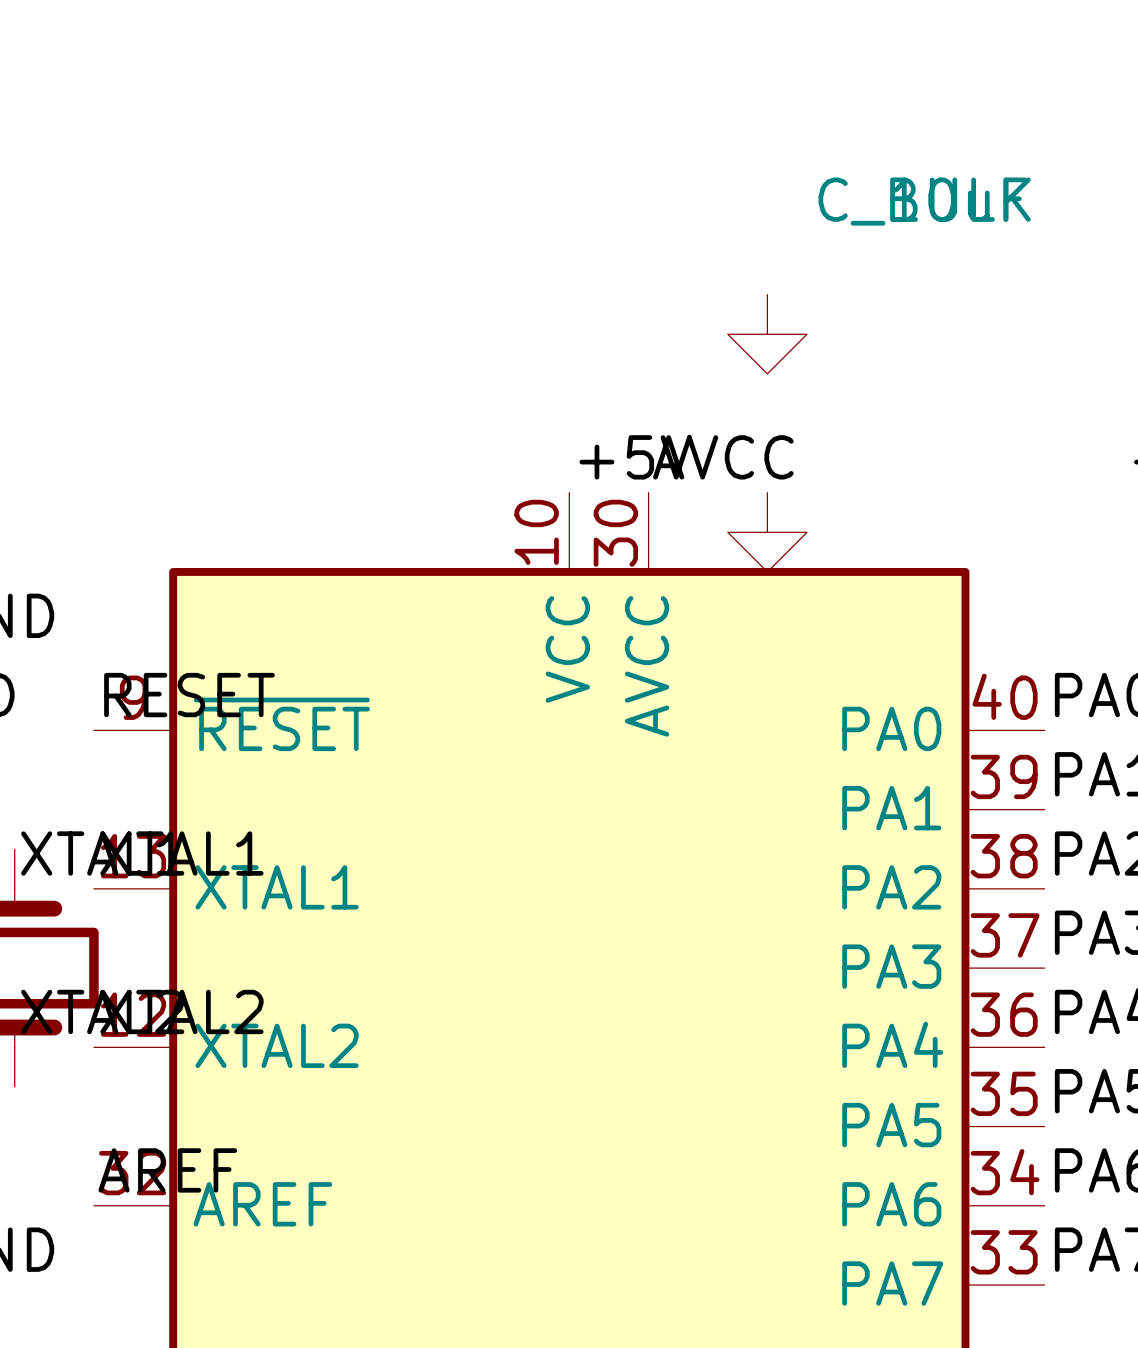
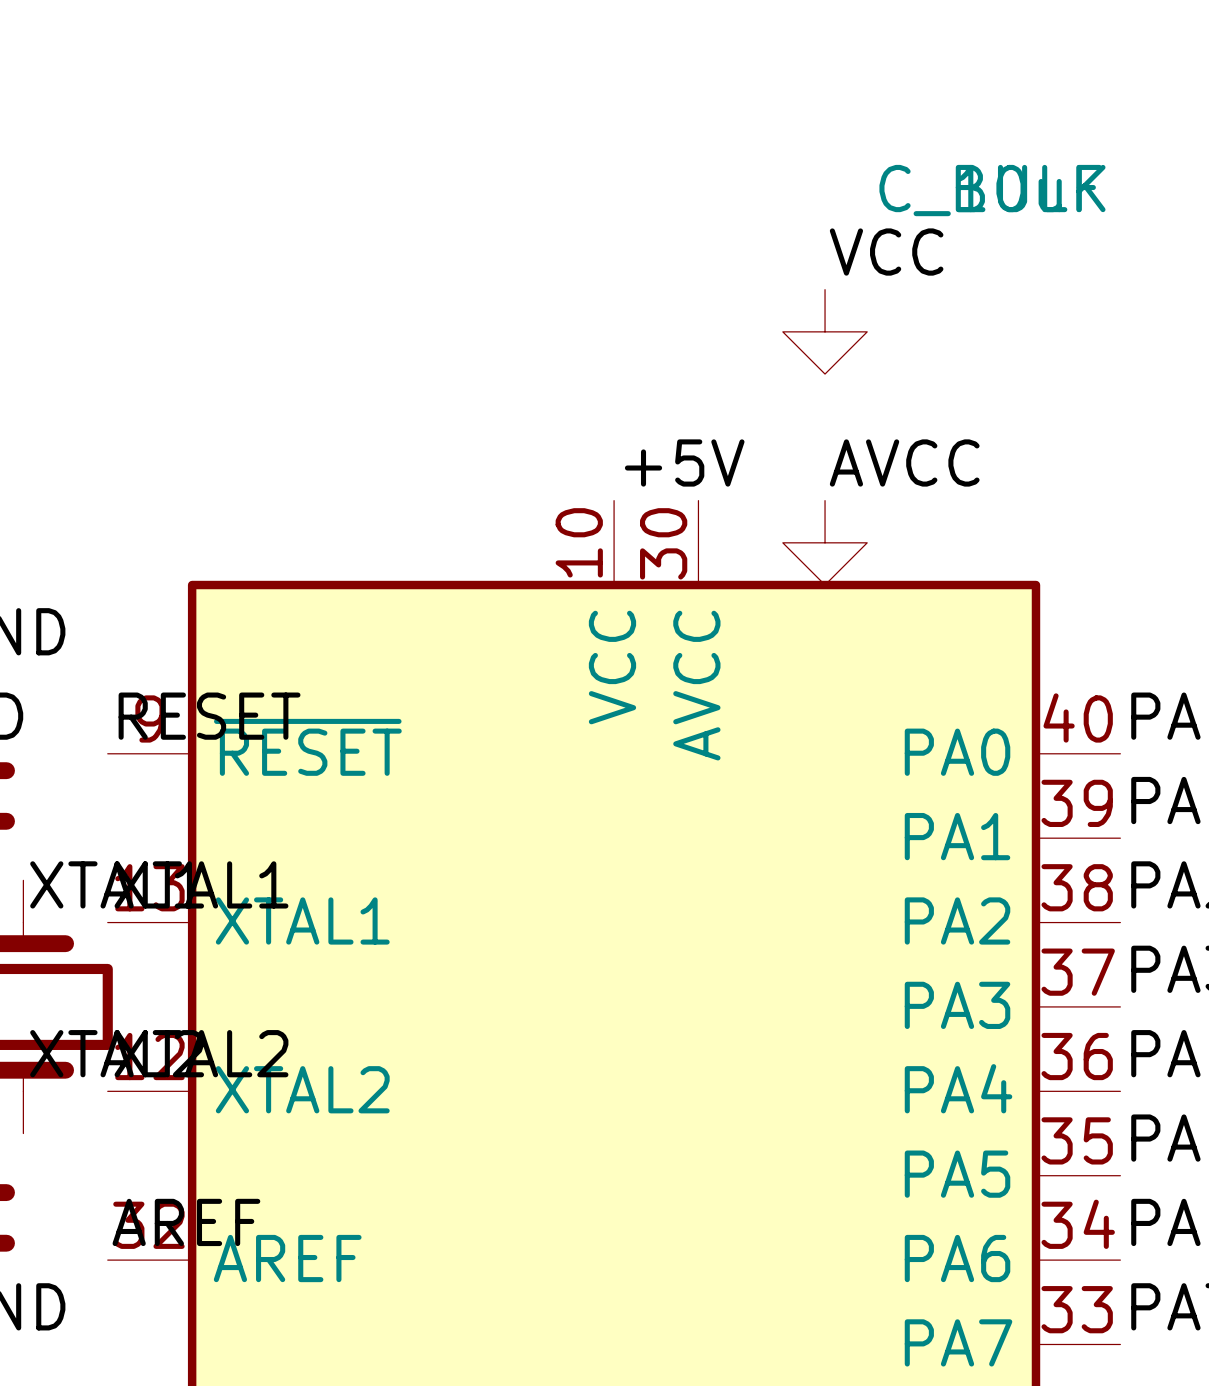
label: none -> VCC (886, 252)
label position: AVCC (723, 457) -> AVCC (904, 462)

